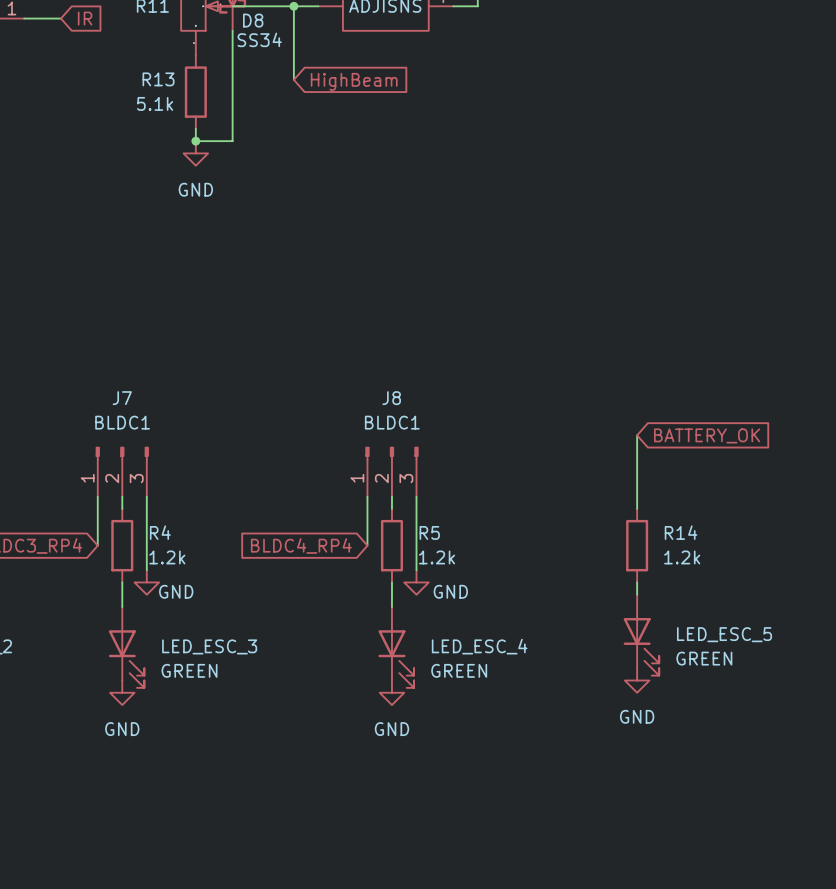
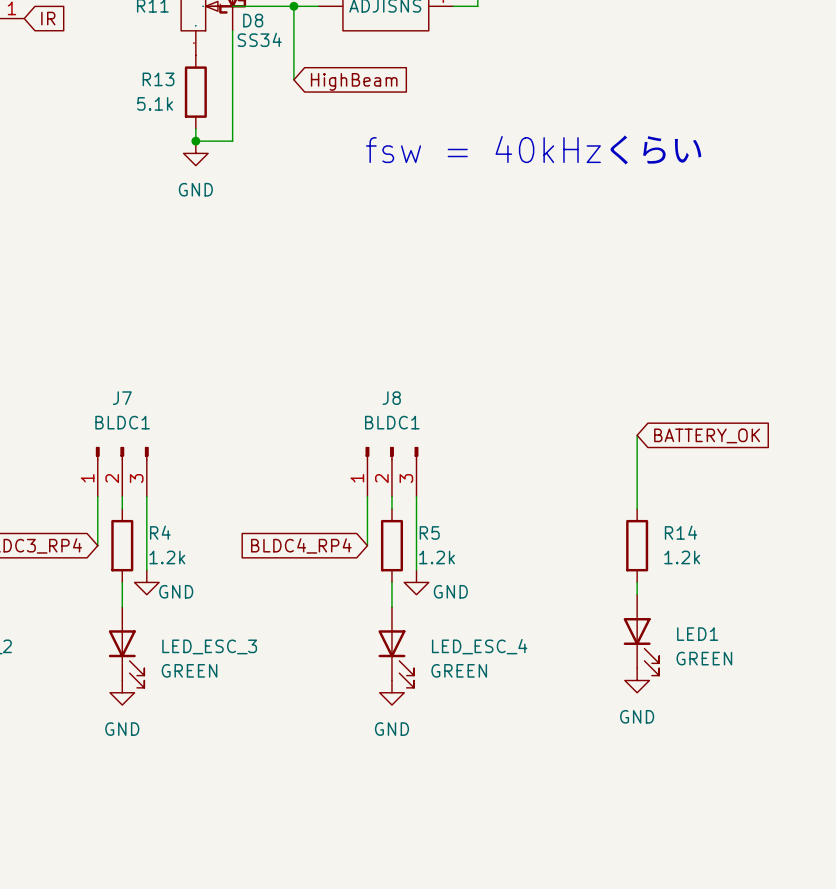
wire: (24, 18) (61, 18) -> none
global label position: IR (85, 18) -> IR (48, 18)
text: none -> fsw = 40kHzくらい (534, 149)
LED_ESC_5 name: LED_ESC_5 (724, 634) -> LED1 (697, 634)

